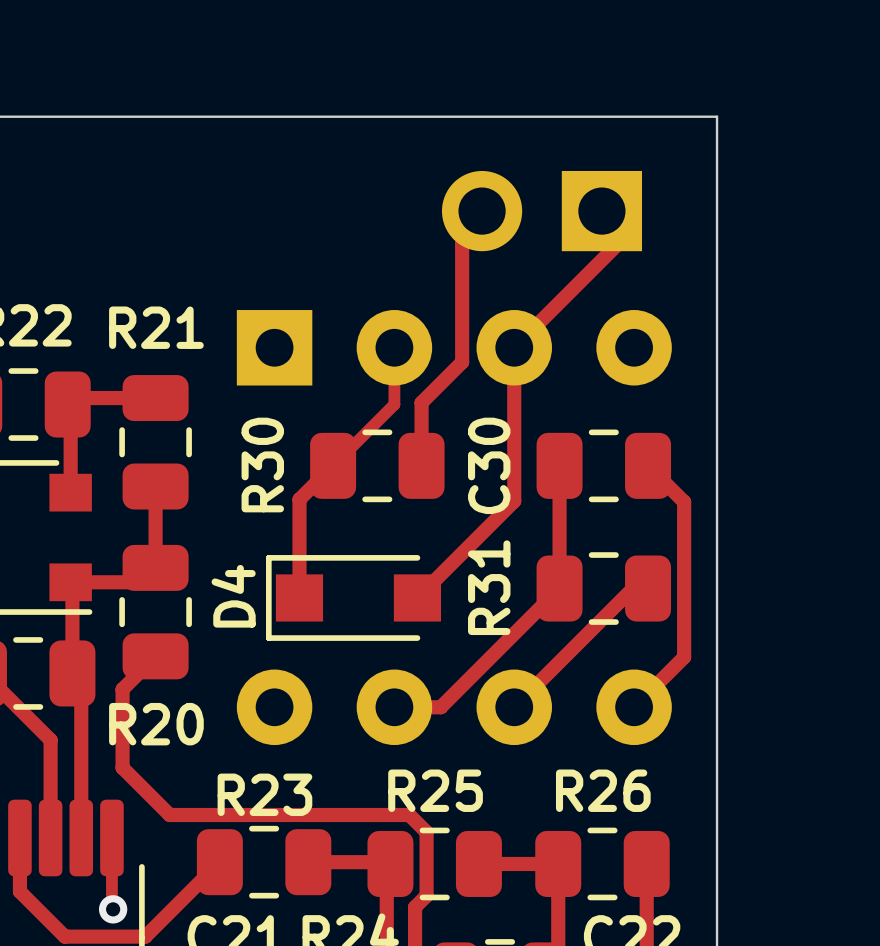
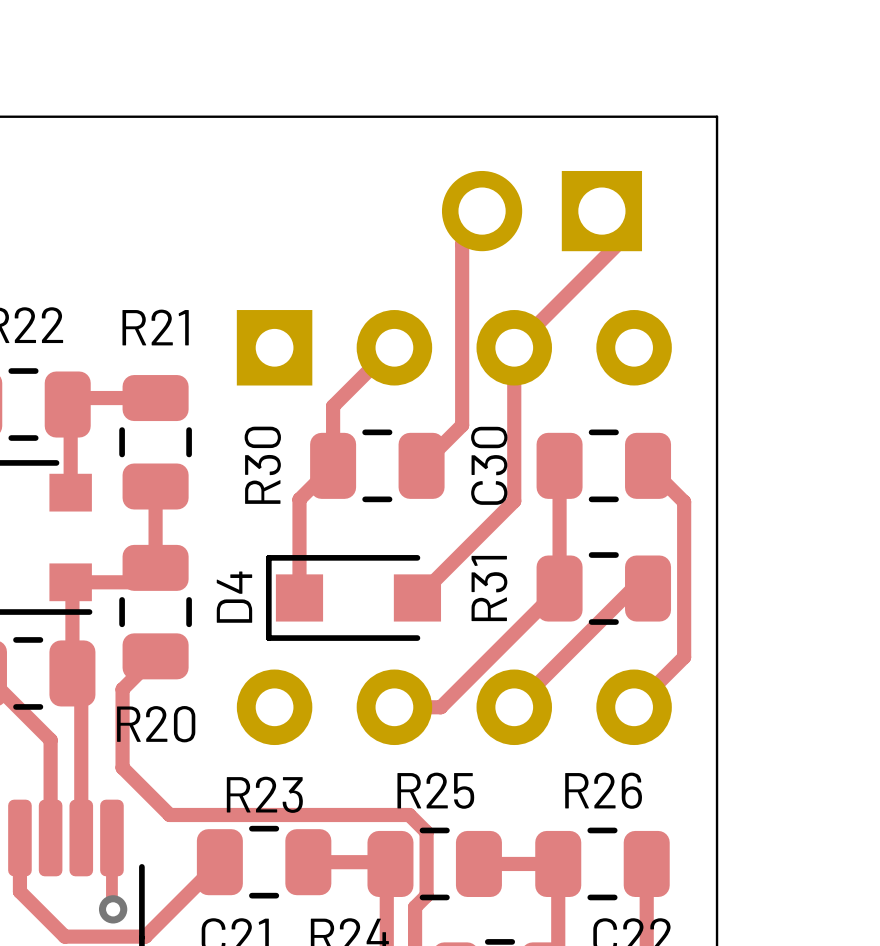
track: (394, 347) (394, 404) (333, 465) -> (394, 347) (391, 347) (333, 406) (333, 465)
track: (462, 362) (421, 402) (421, 465) -> (462, 362) (462, 425) (421, 465)

